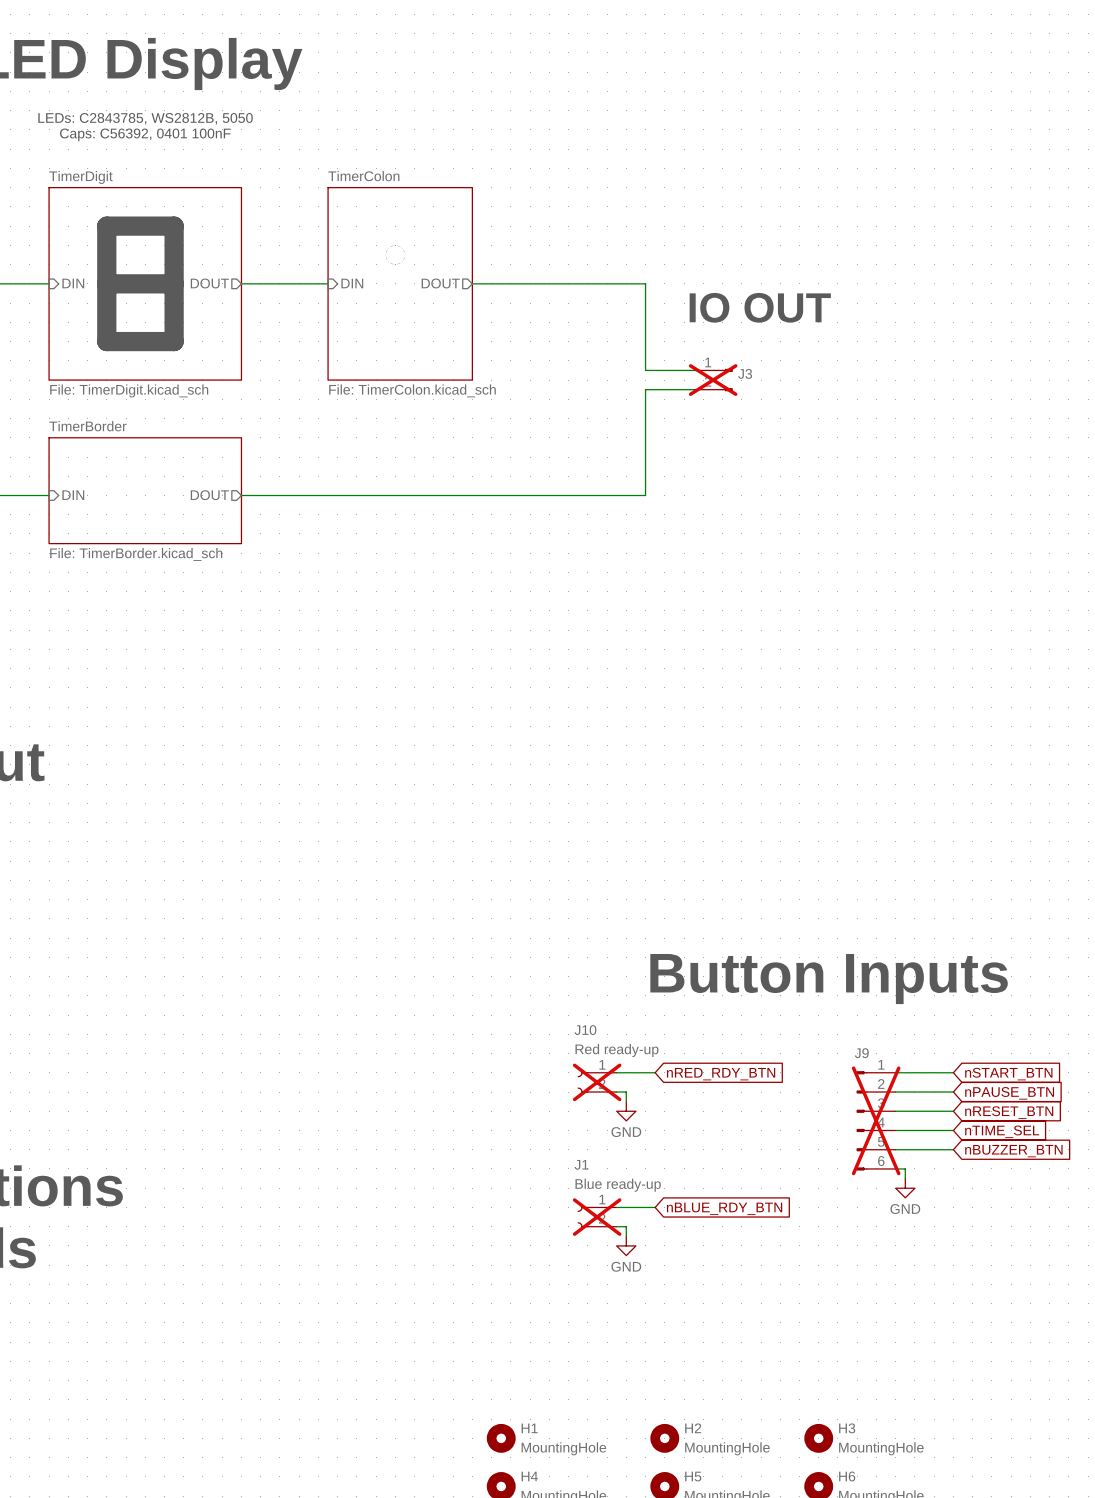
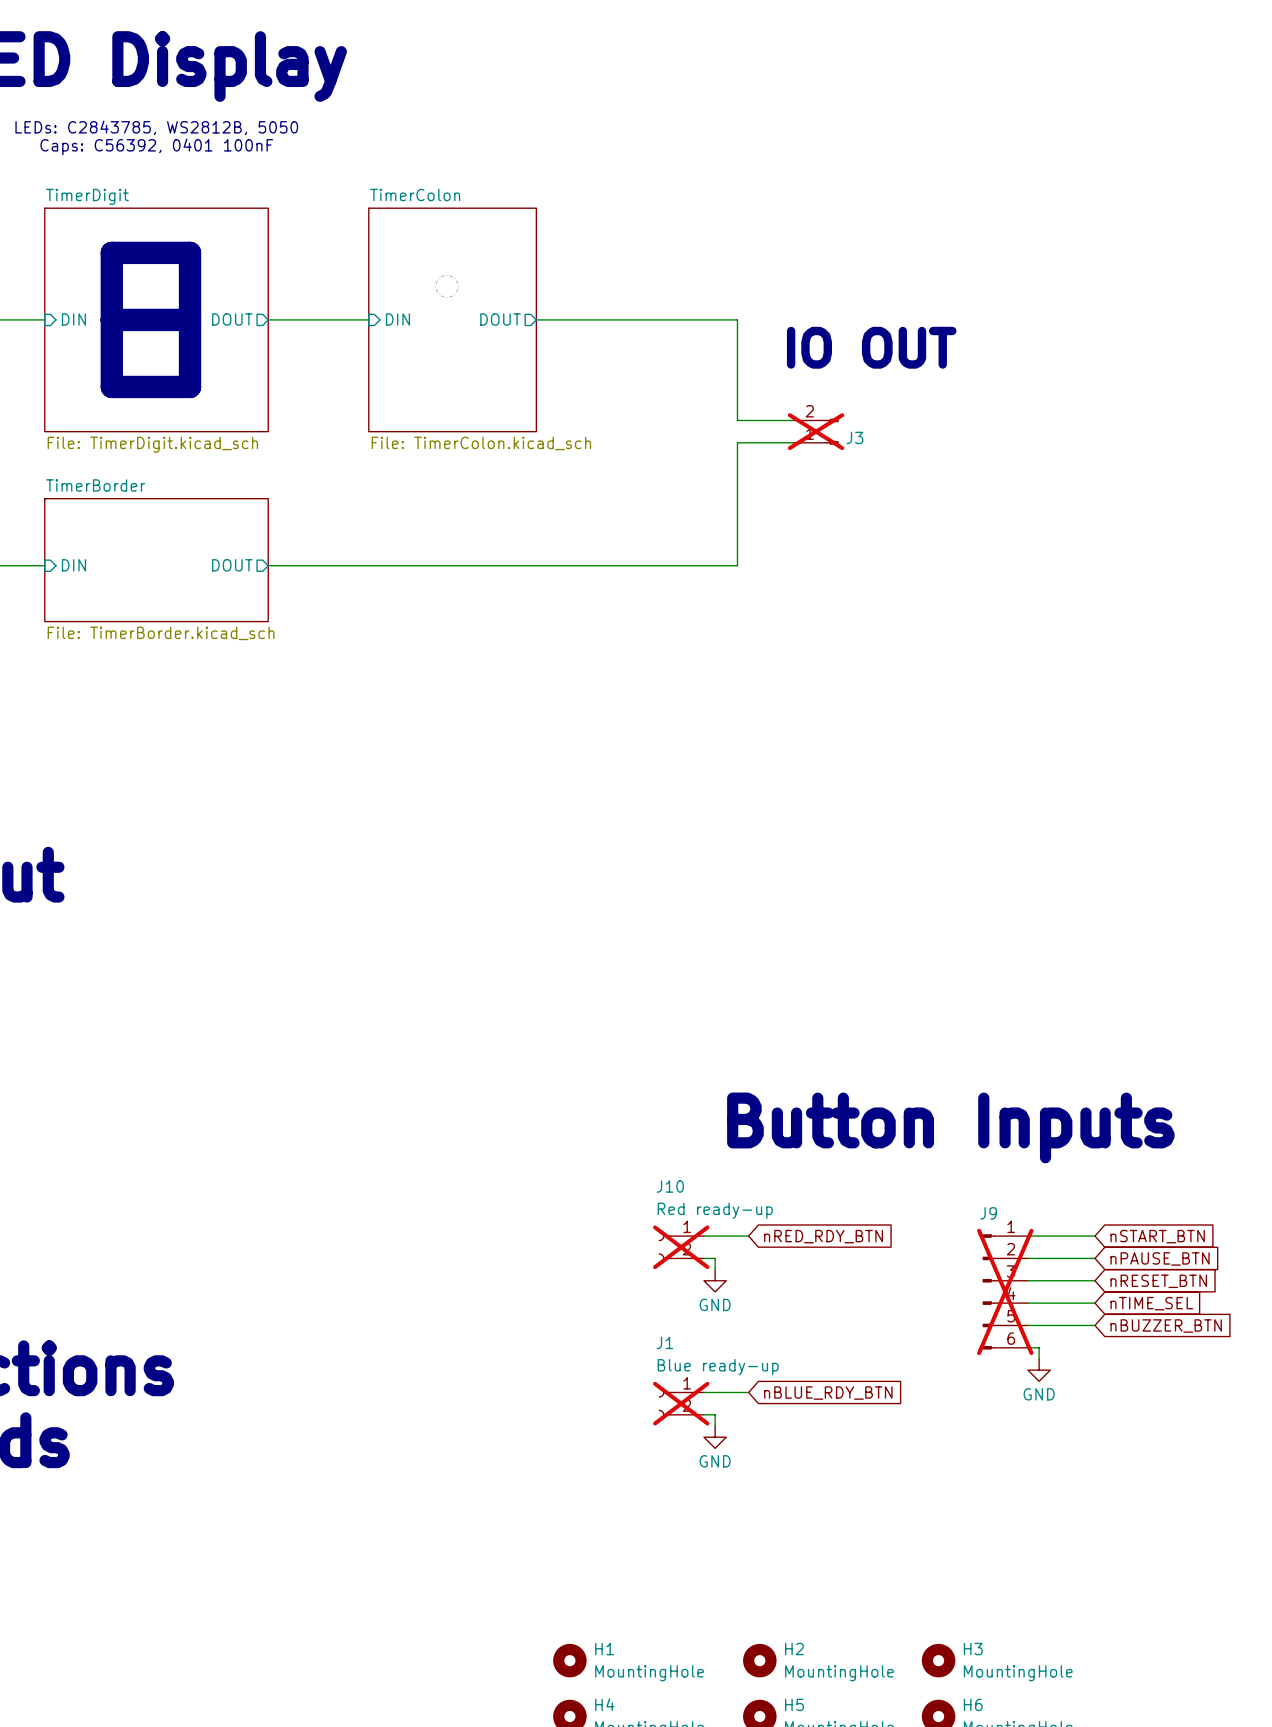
J3 flip: as is (727, 380) -> up-down (832, 431)

